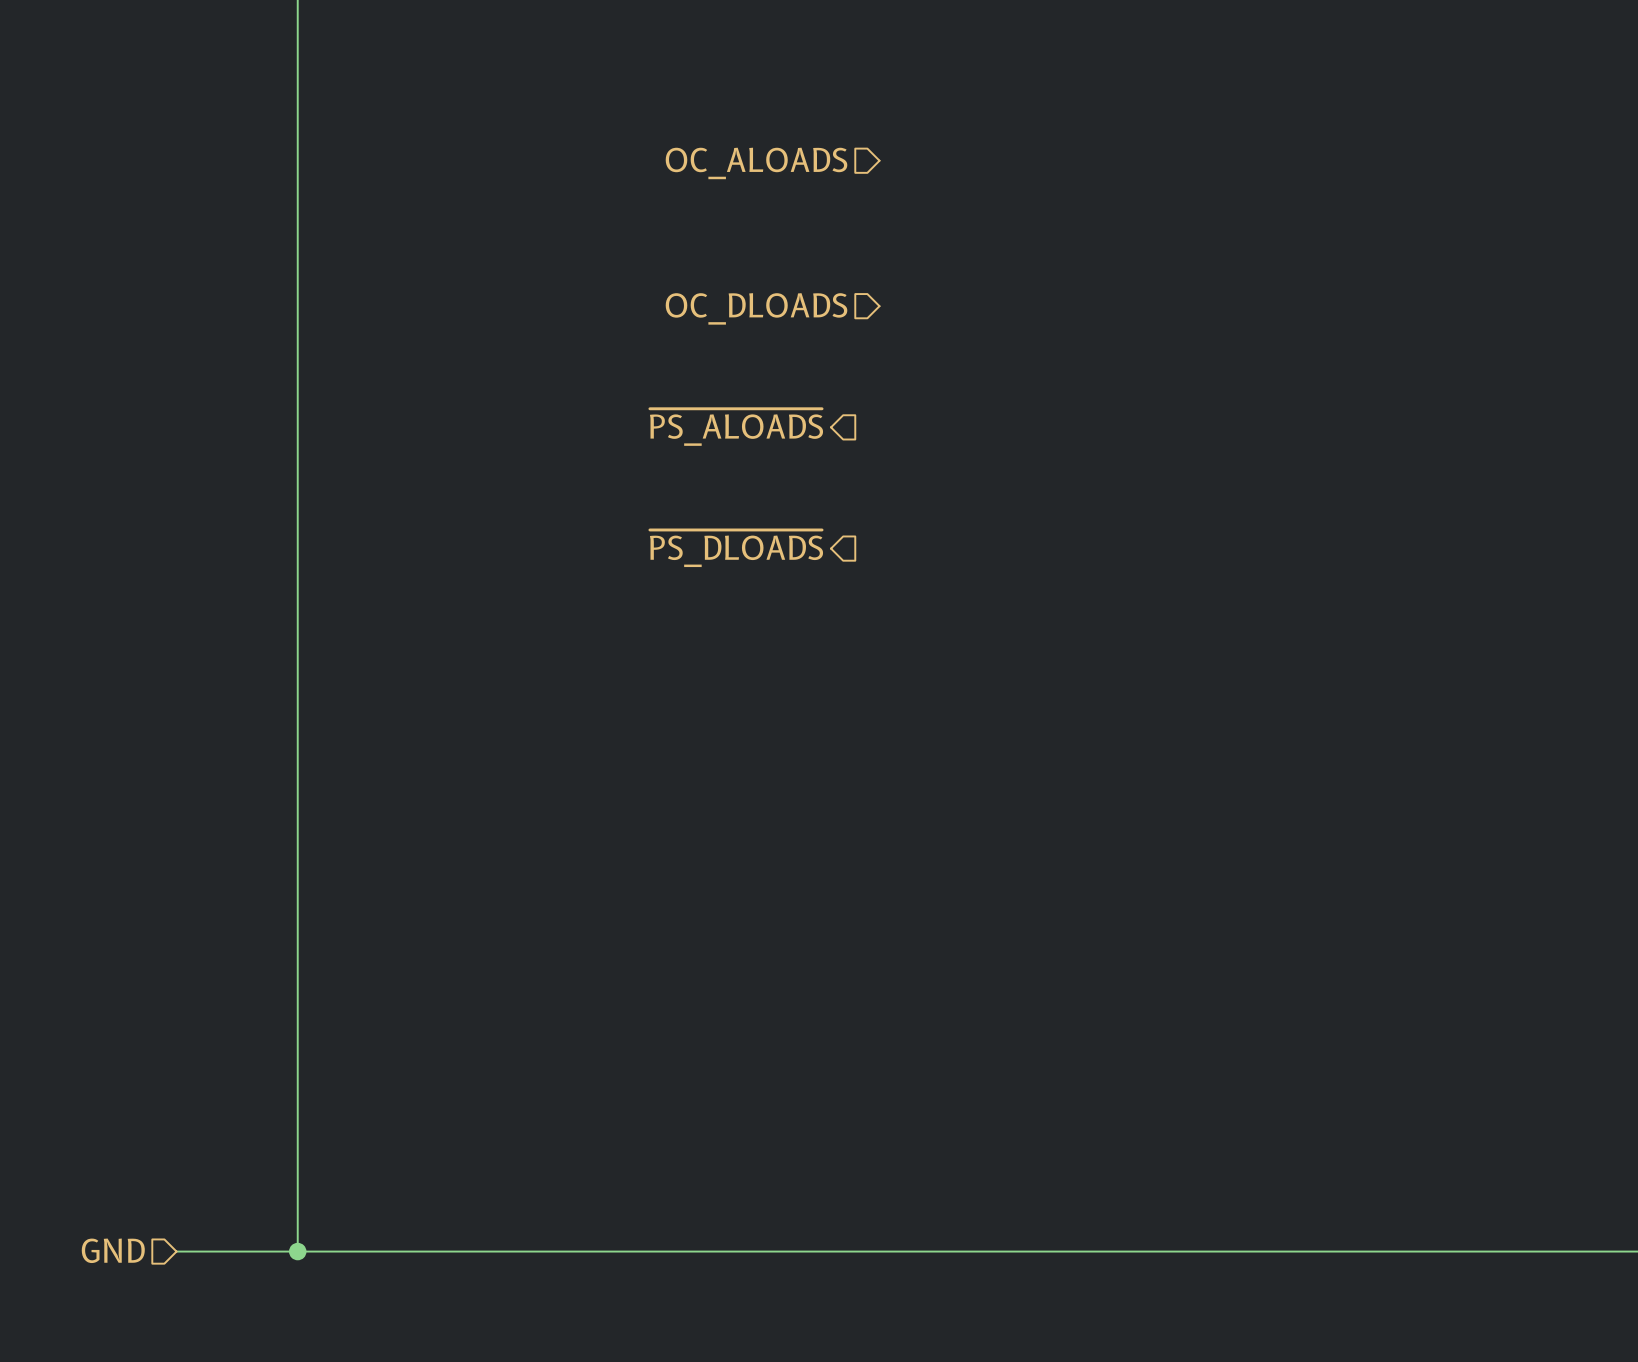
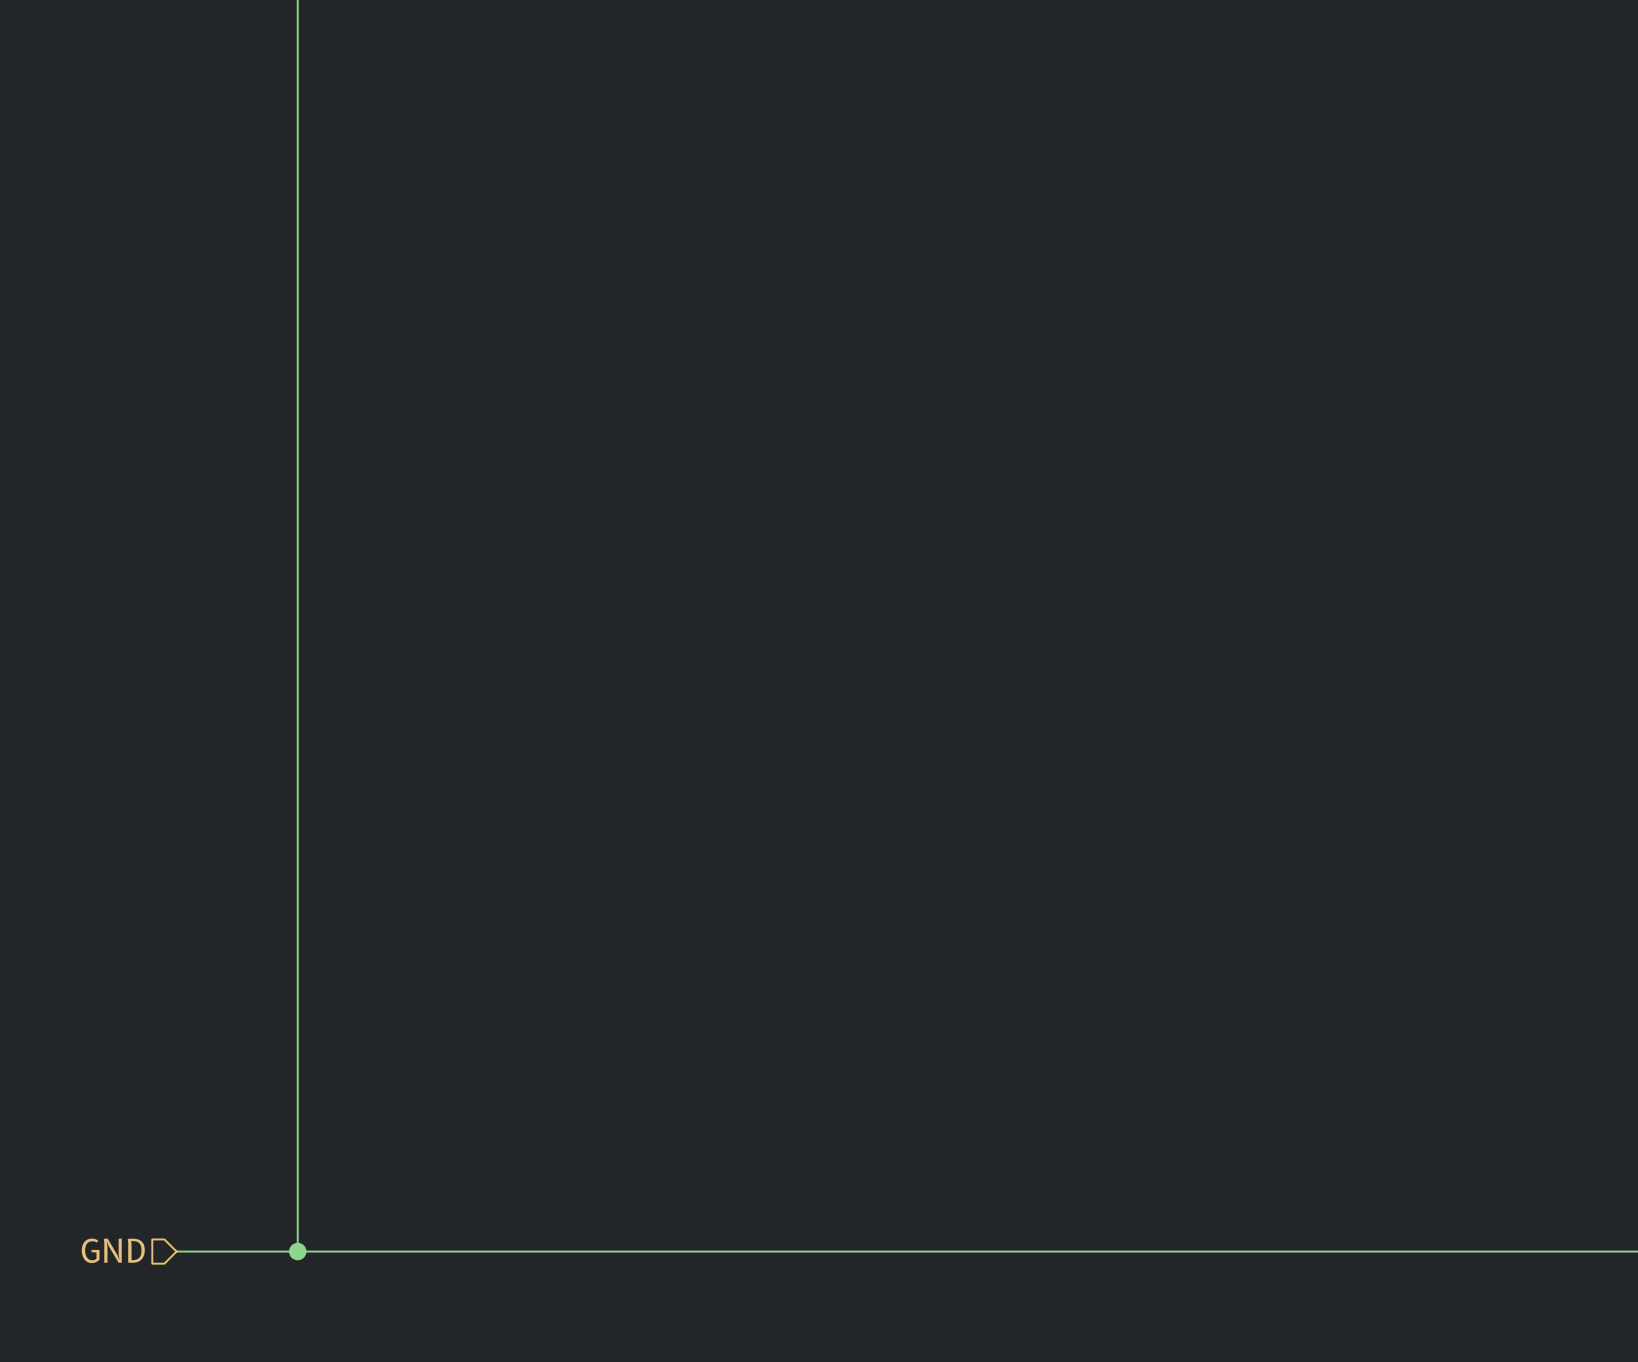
hierarchical label: OC_ALOADS (756, 163) -> none
hierarchical label: OC_DLOADS (756, 308) -> none
hierarchical label: ~{PS_ALOADS} (736, 427) -> none
hierarchical label: ~{PS_DLOADS} (736, 548) -> none

